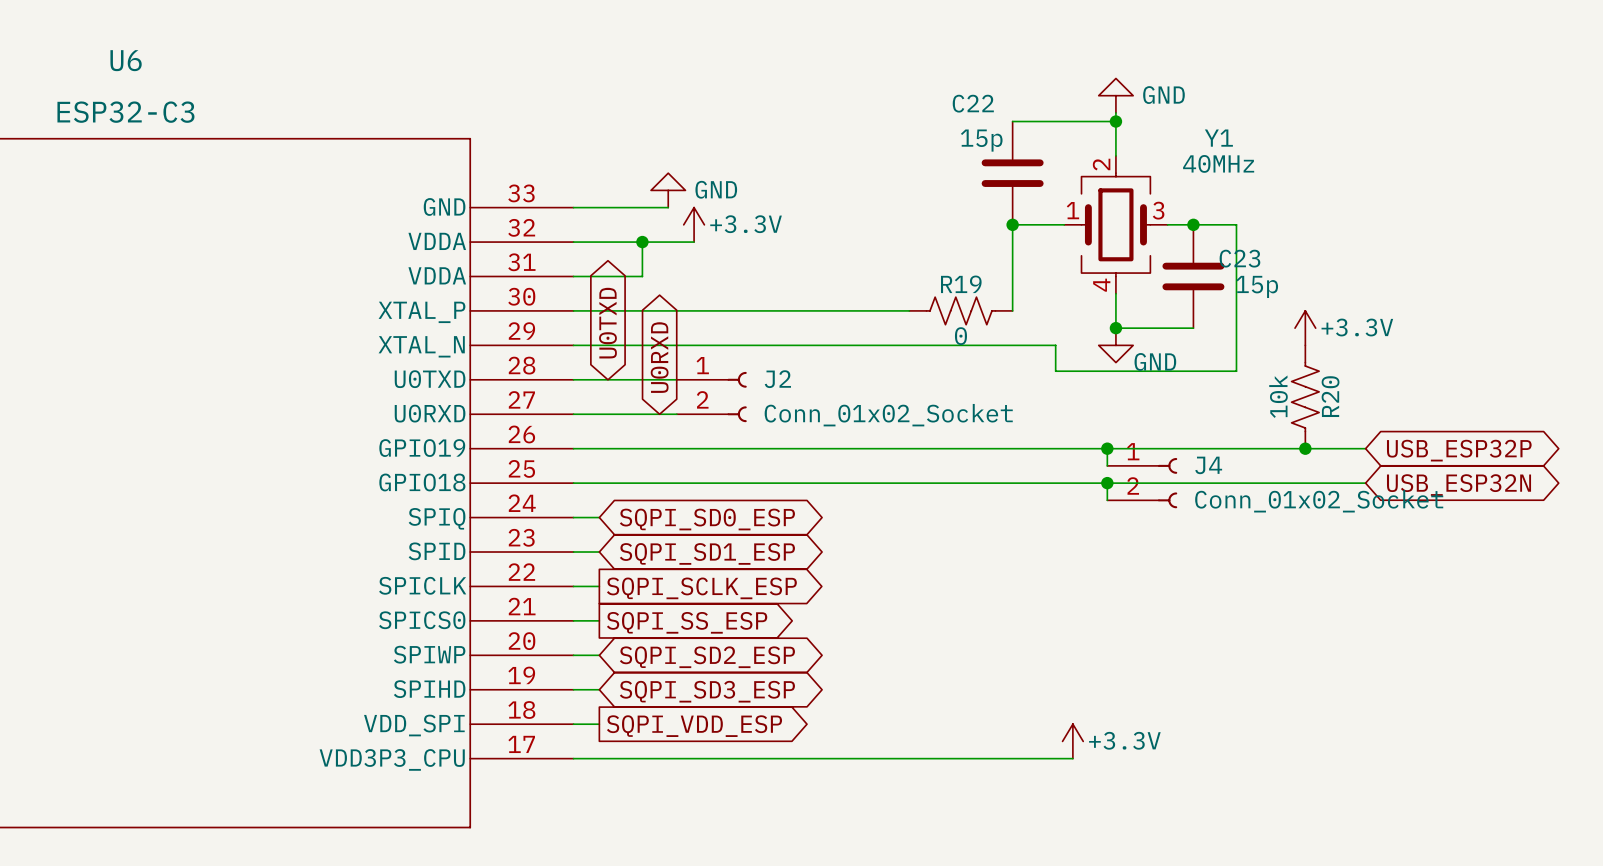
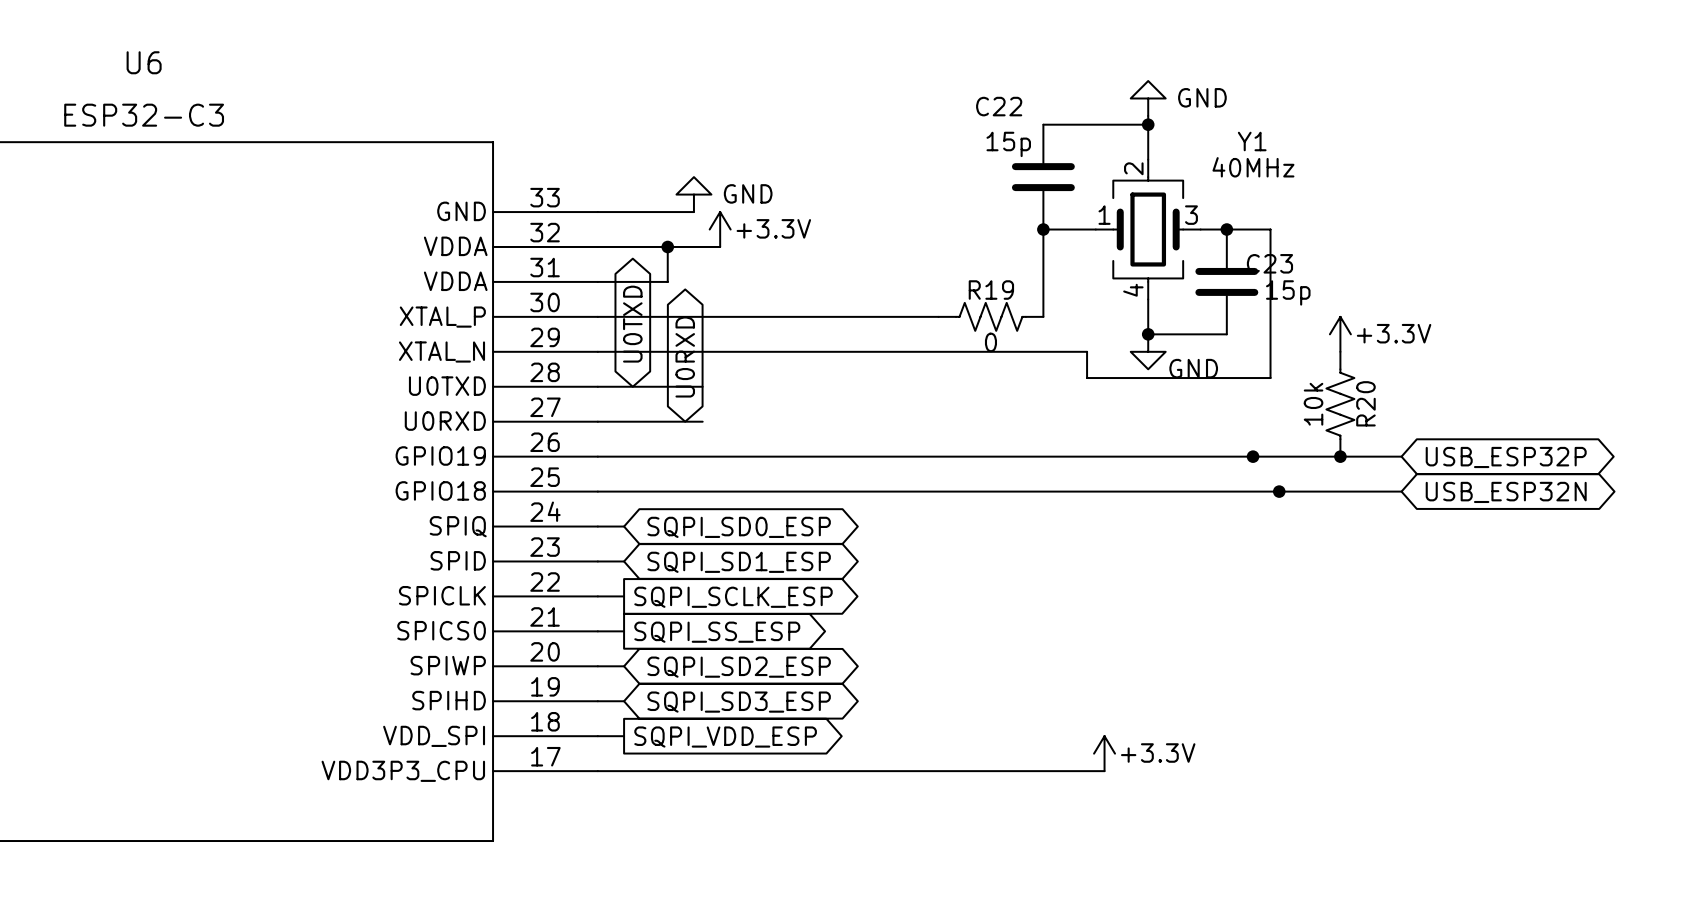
J2: Conn_01x02_Socket (711, 397) -> none
wire: (1107, 448) (1107, 465) -> none
junction: (1107, 448) -> none
junction: none -> (1253, 456)
wire: (1107, 483) (1107, 500) -> none
junction: (1107, 483) -> none
J4: Conn_01x02_Socket (1142, 483) -> none
junction: none -> (1279, 491)

